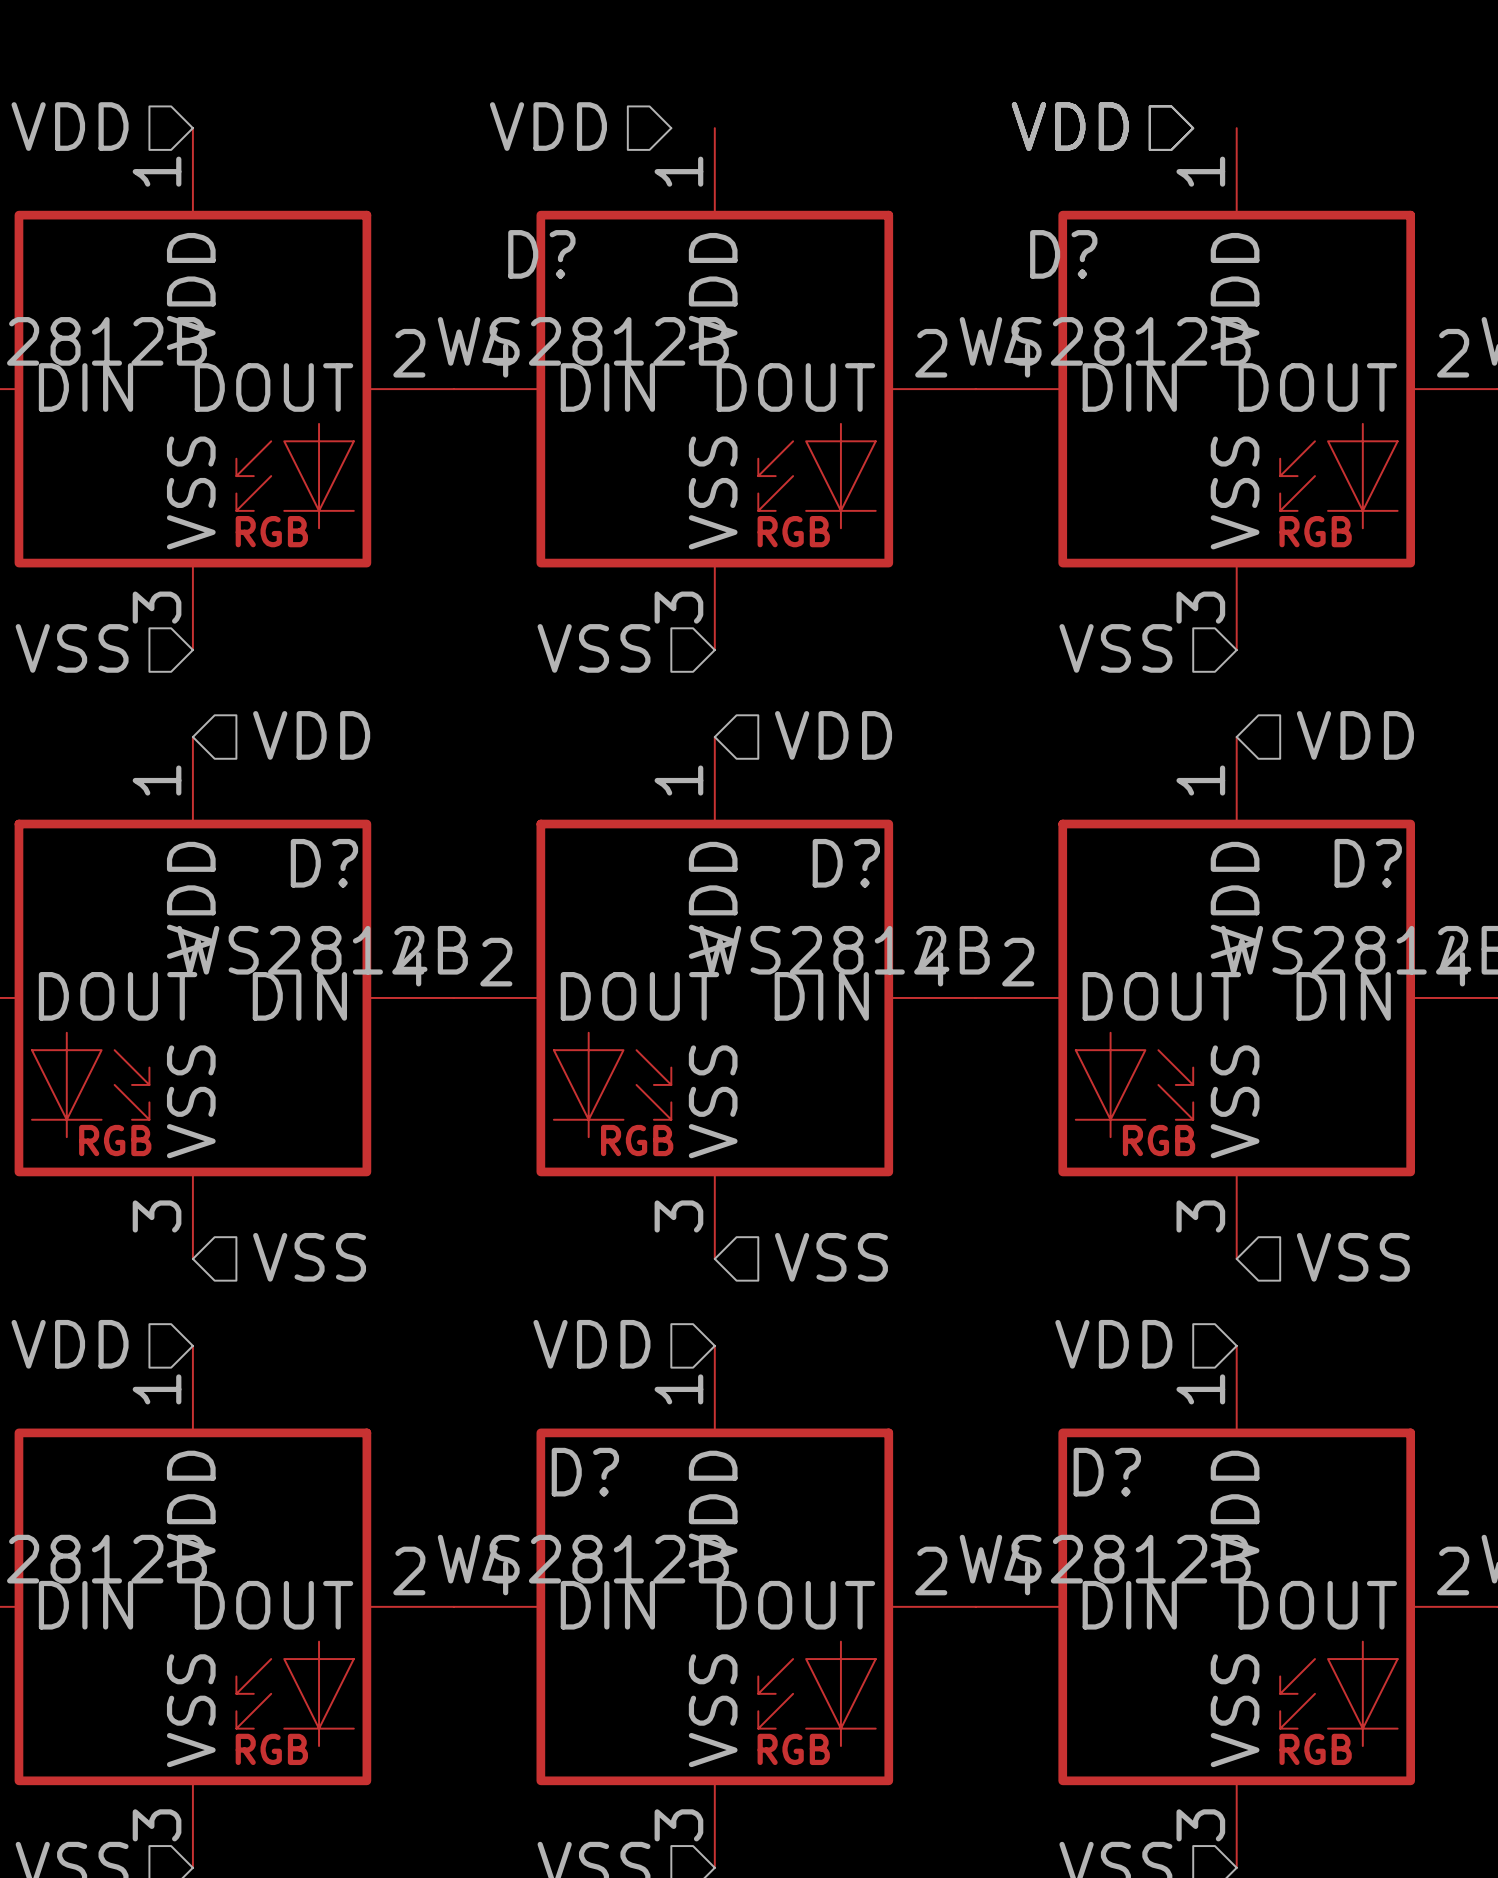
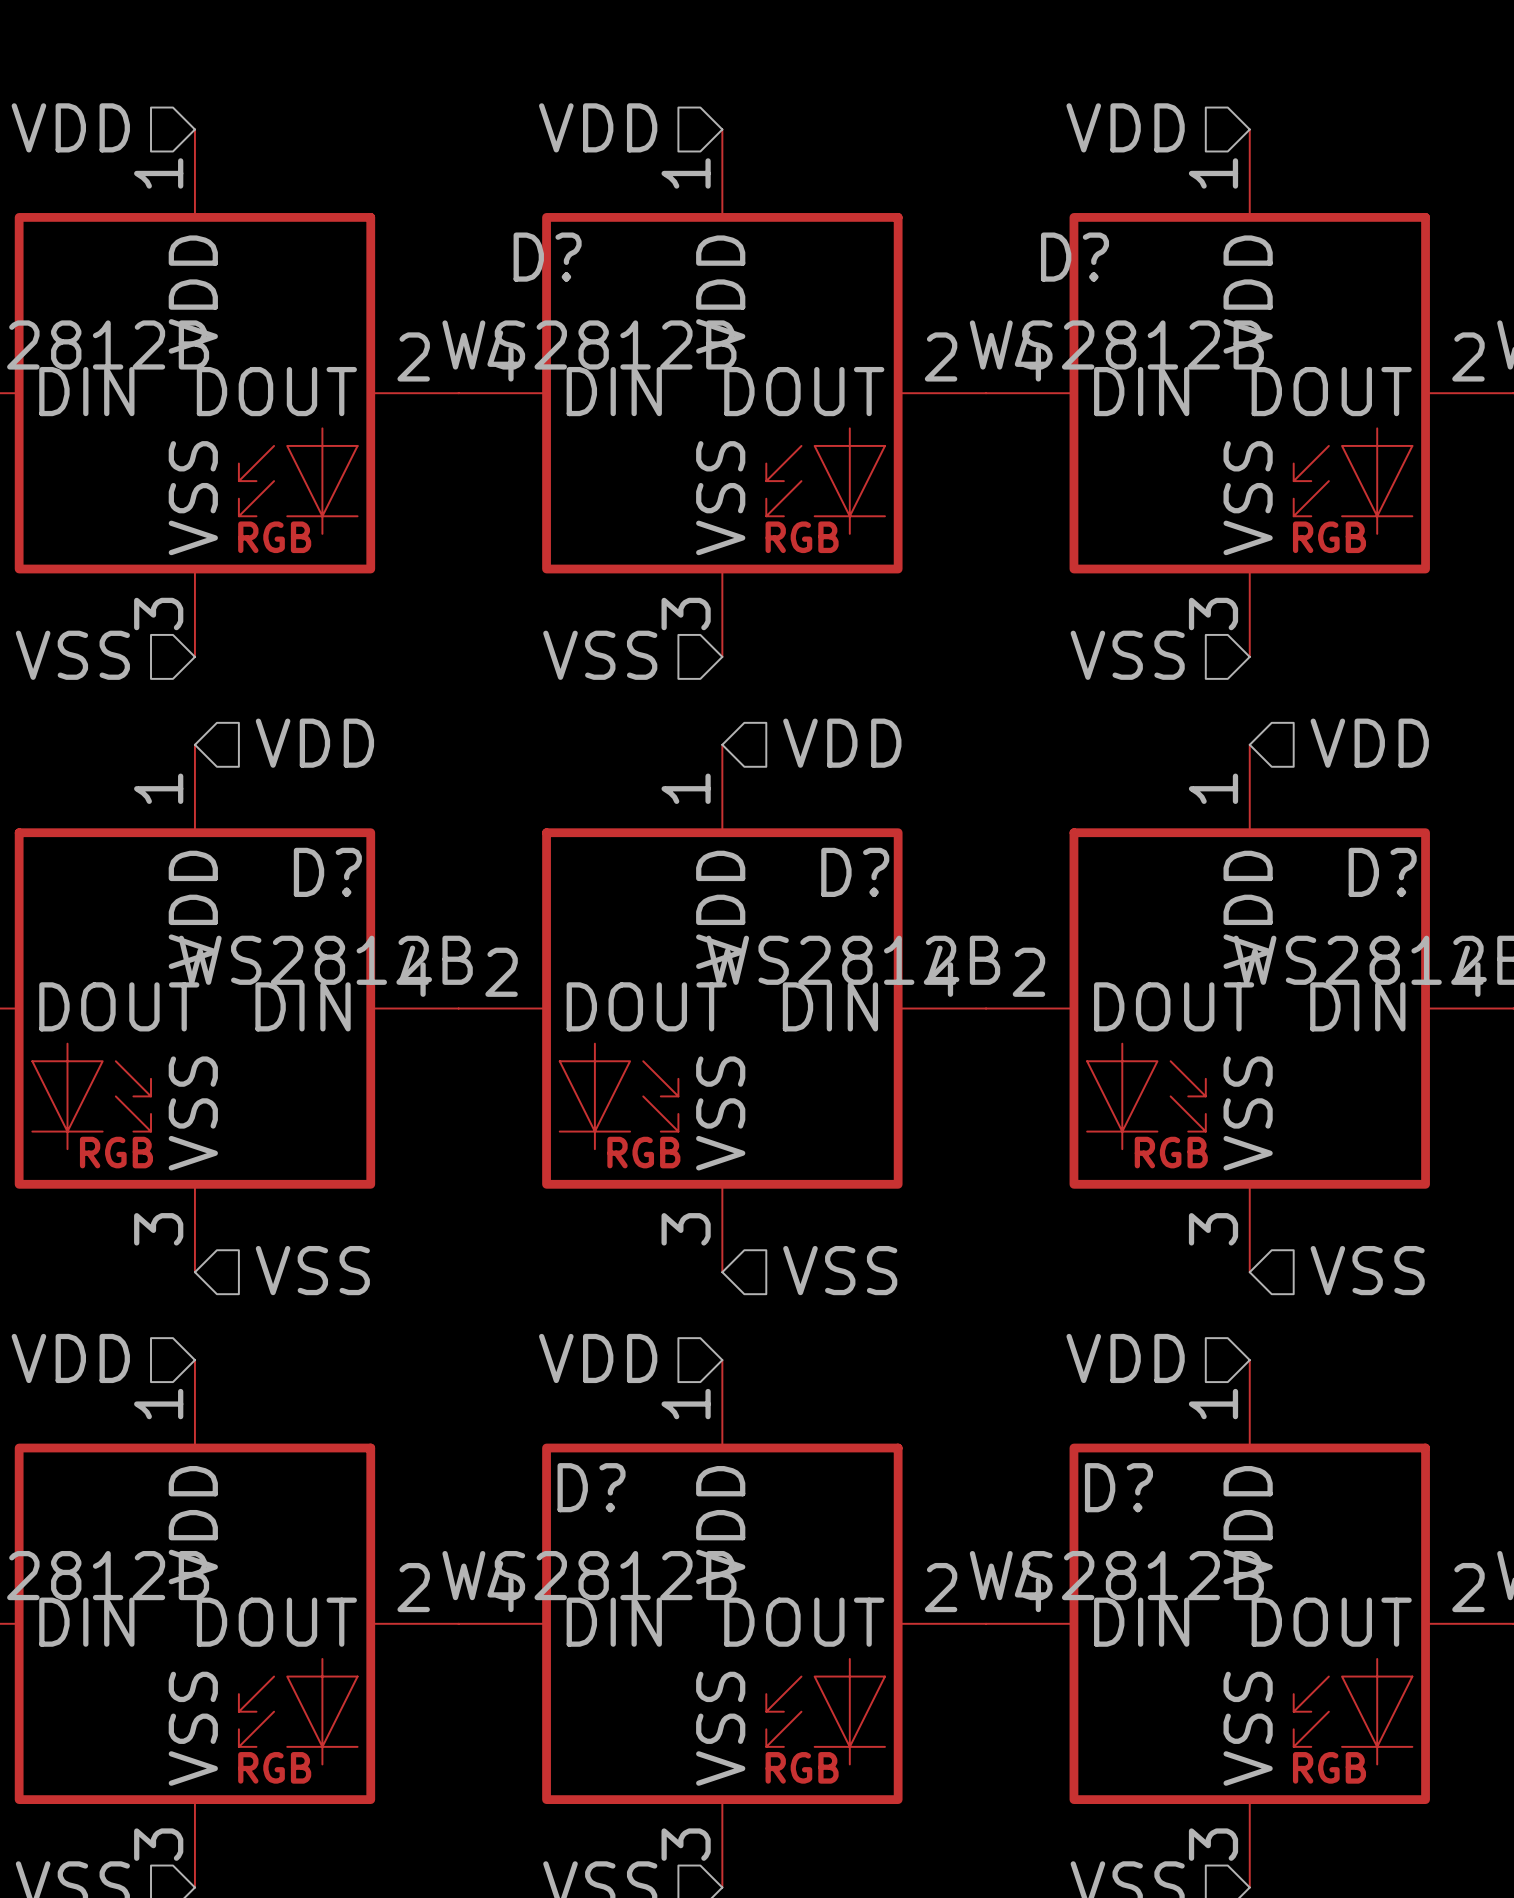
hierarchical label position: VDD (548, 126) -> VDD (598, 127)
hierarchical label position: VDD (1070, 126) -> VDD (1125, 127)

